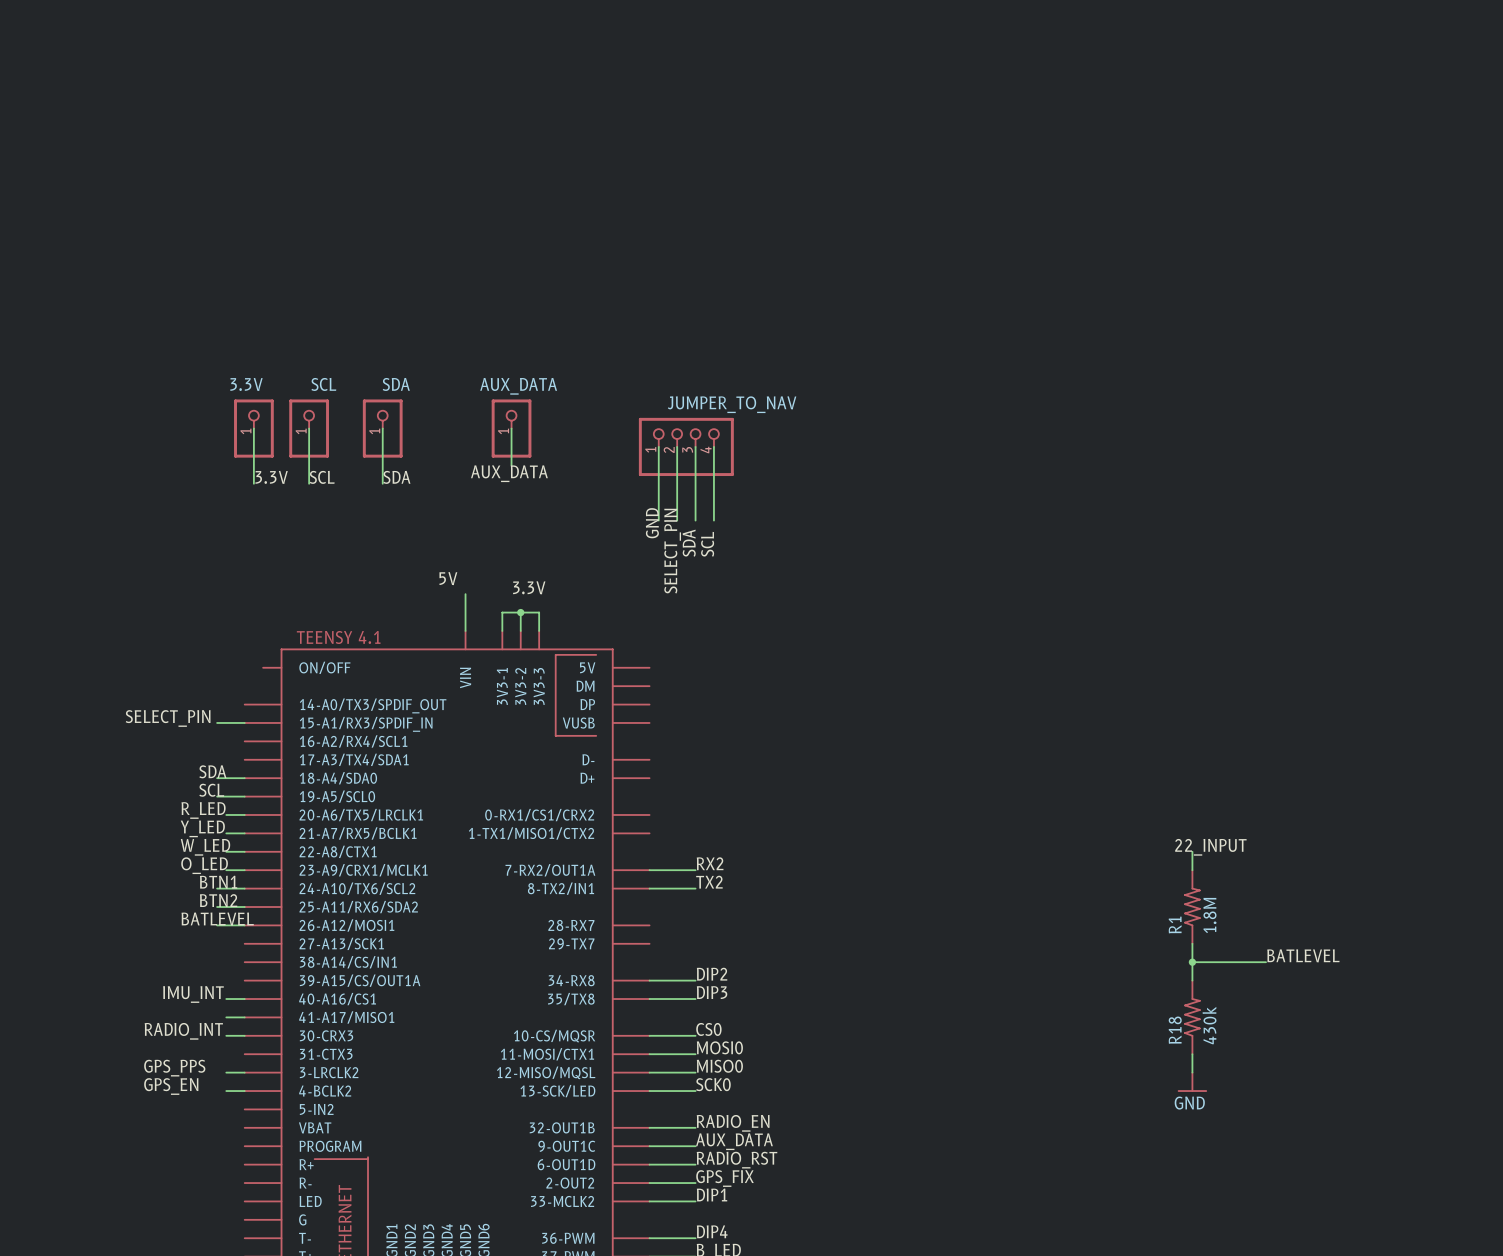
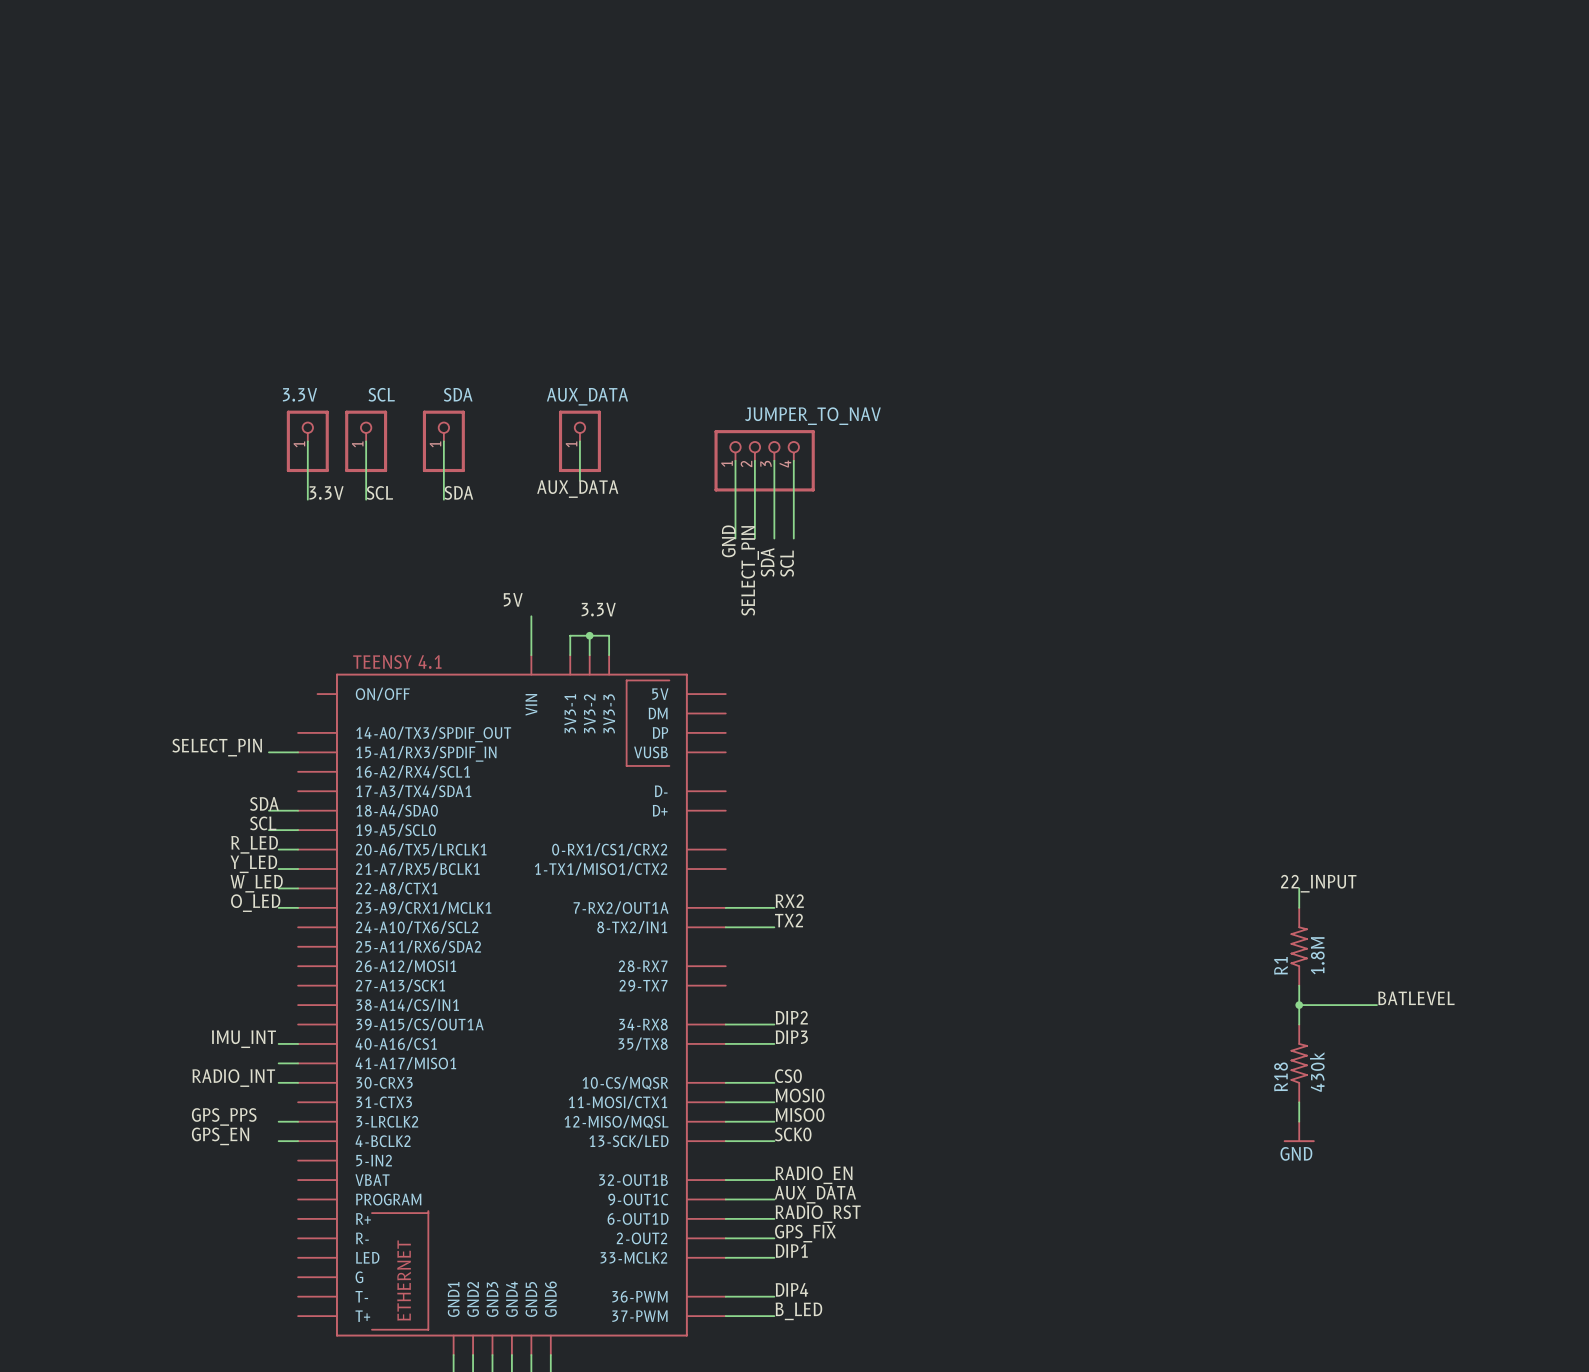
label: BTN1 (218, 882) -> none
wire: (217, 888) (244, 888) -> none
label: BTN2 (218, 900) -> none
wire: (217, 907) (244, 907) -> none
label: BATLEVEL (217, 919) -> none
wire: (217, 925) (244, 925) -> none

